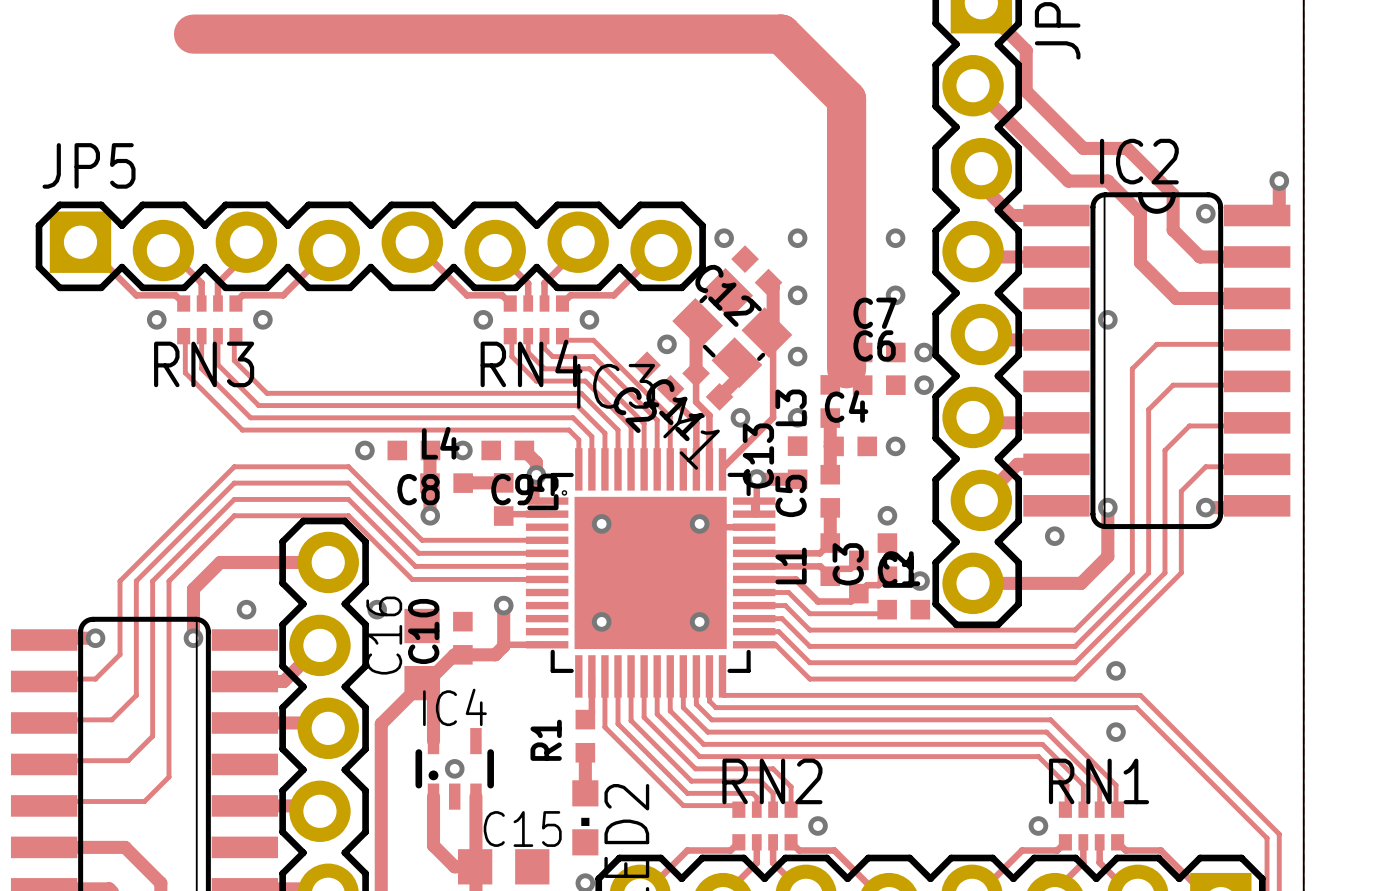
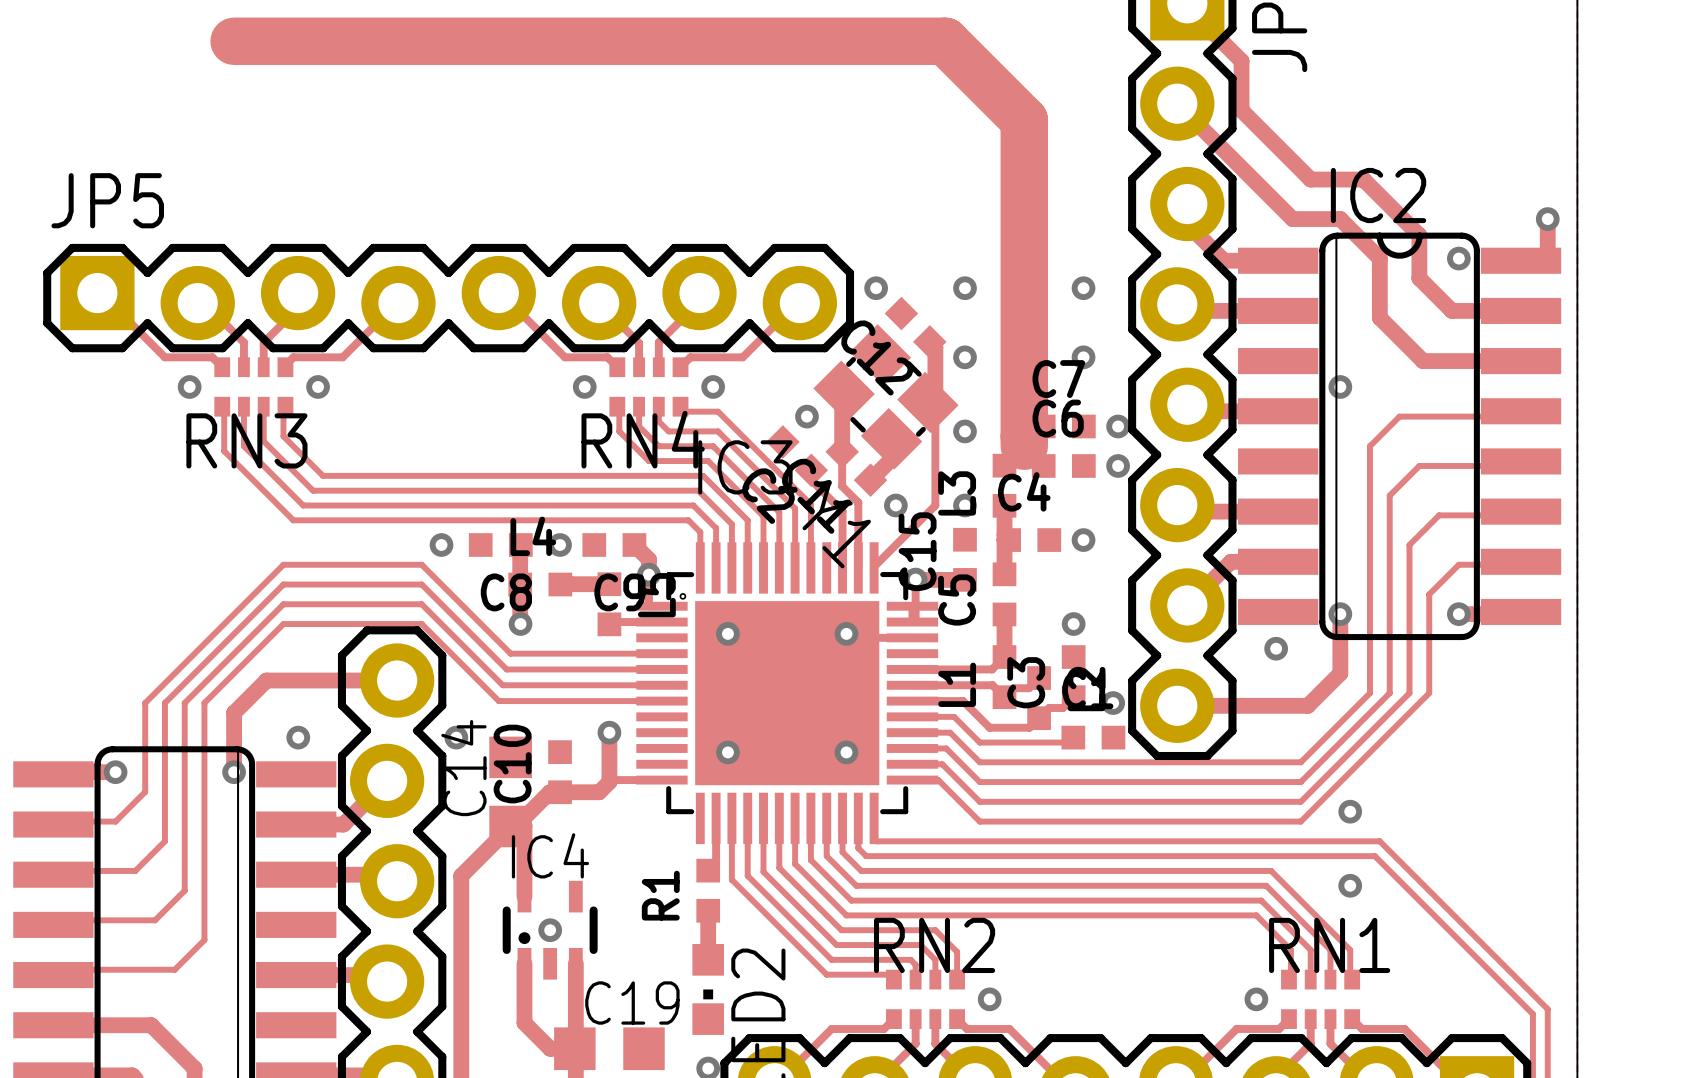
C13 name: C13 (758, 455) -> C15 (917, 551)
C16 name: C16 (384, 635) -> C14 (463, 768)
C15 name: C15 (522, 829) -> C19 (632, 1002)

